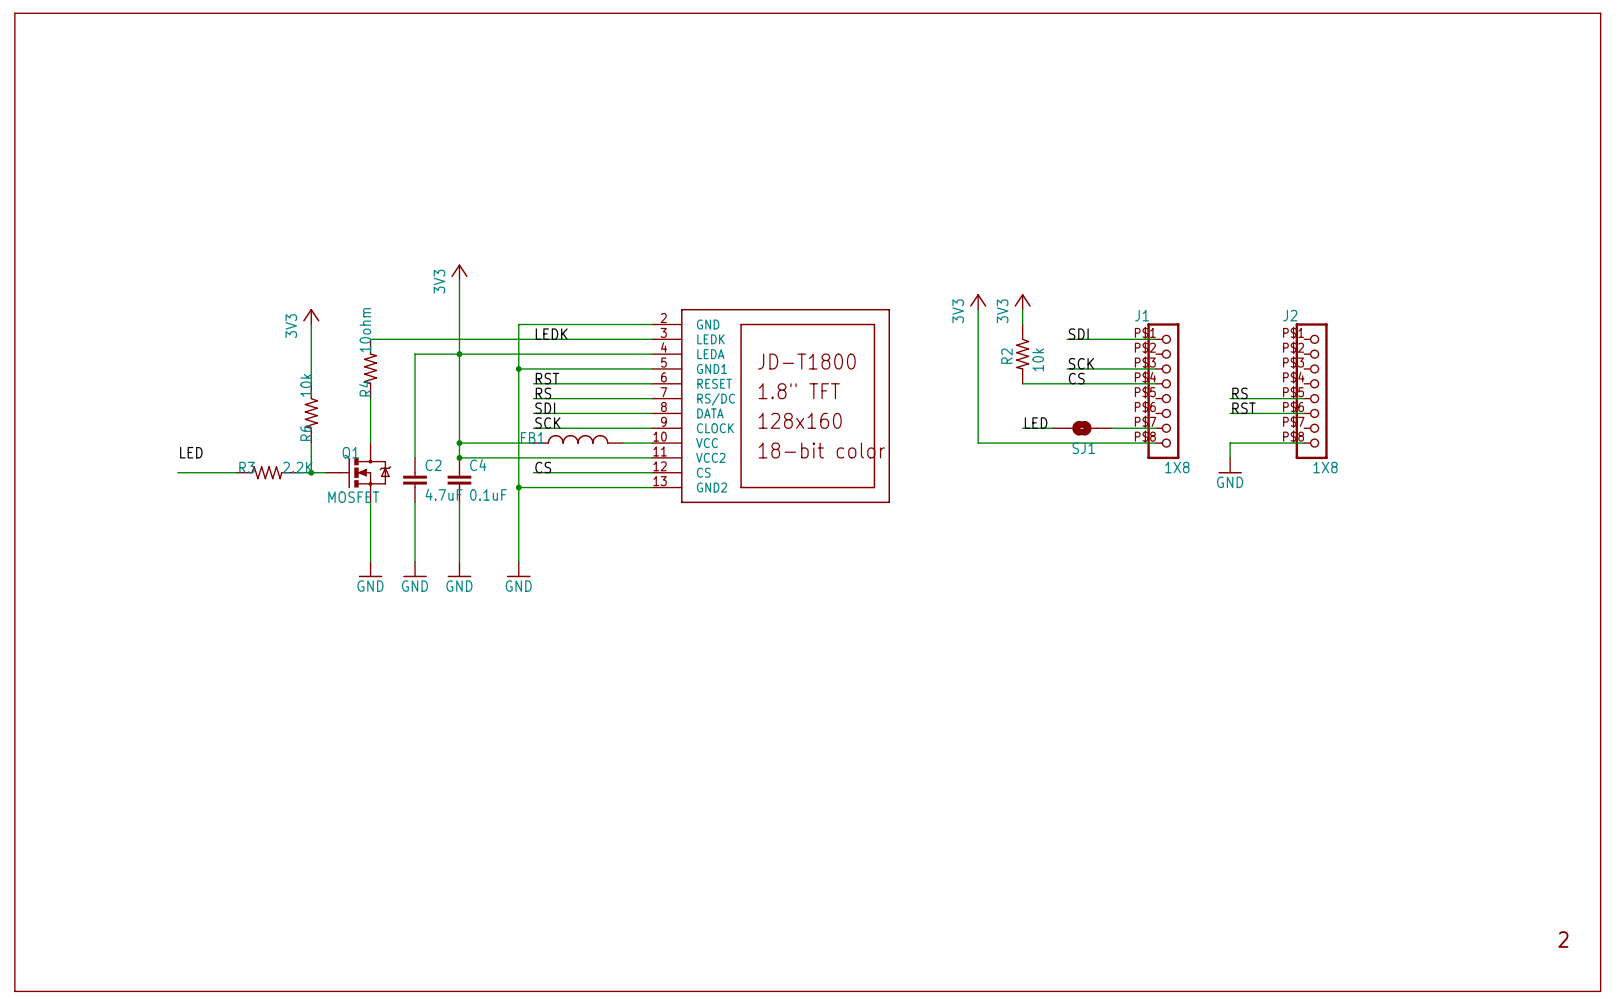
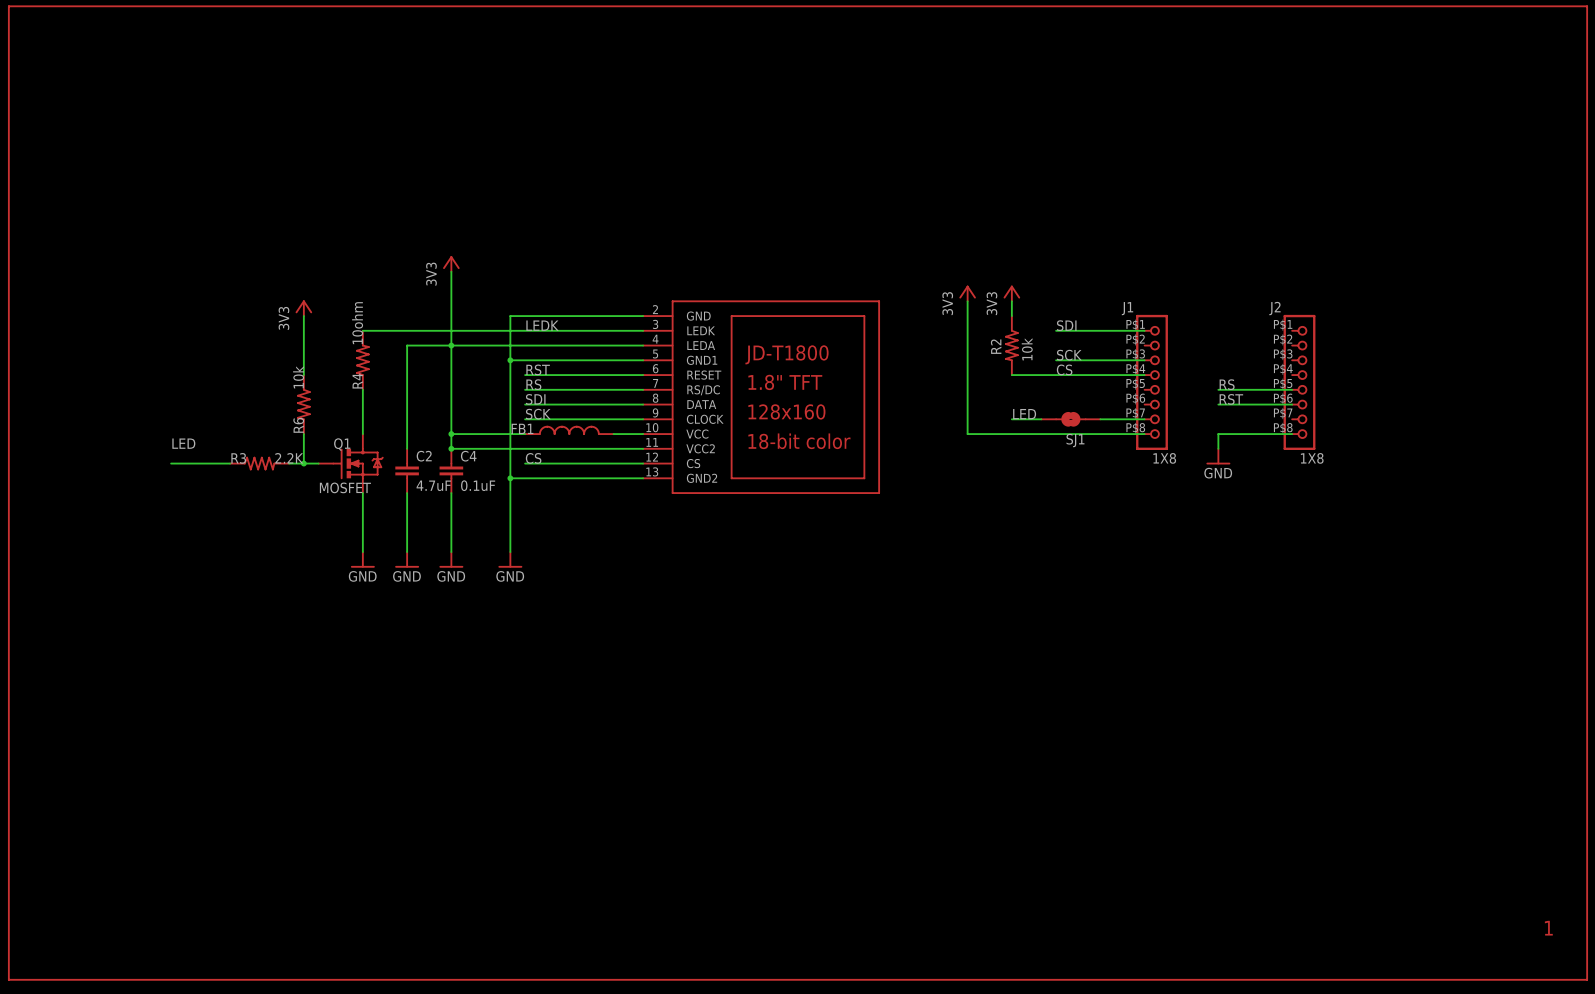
text: 2 (1563, 939) -> 1 (1548, 928)

